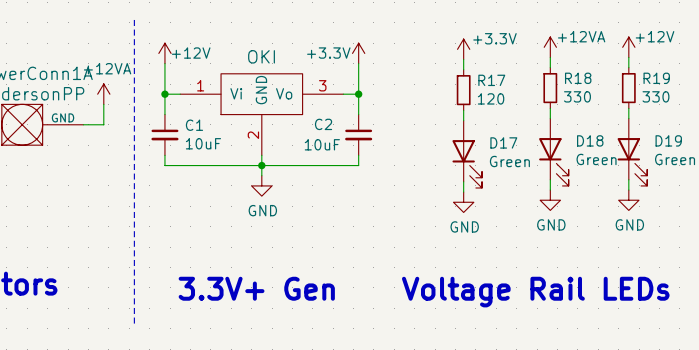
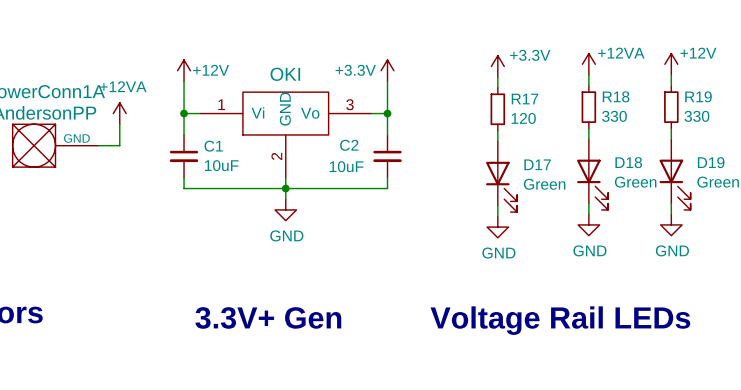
line: (134, 17) (134, 323) -> none

